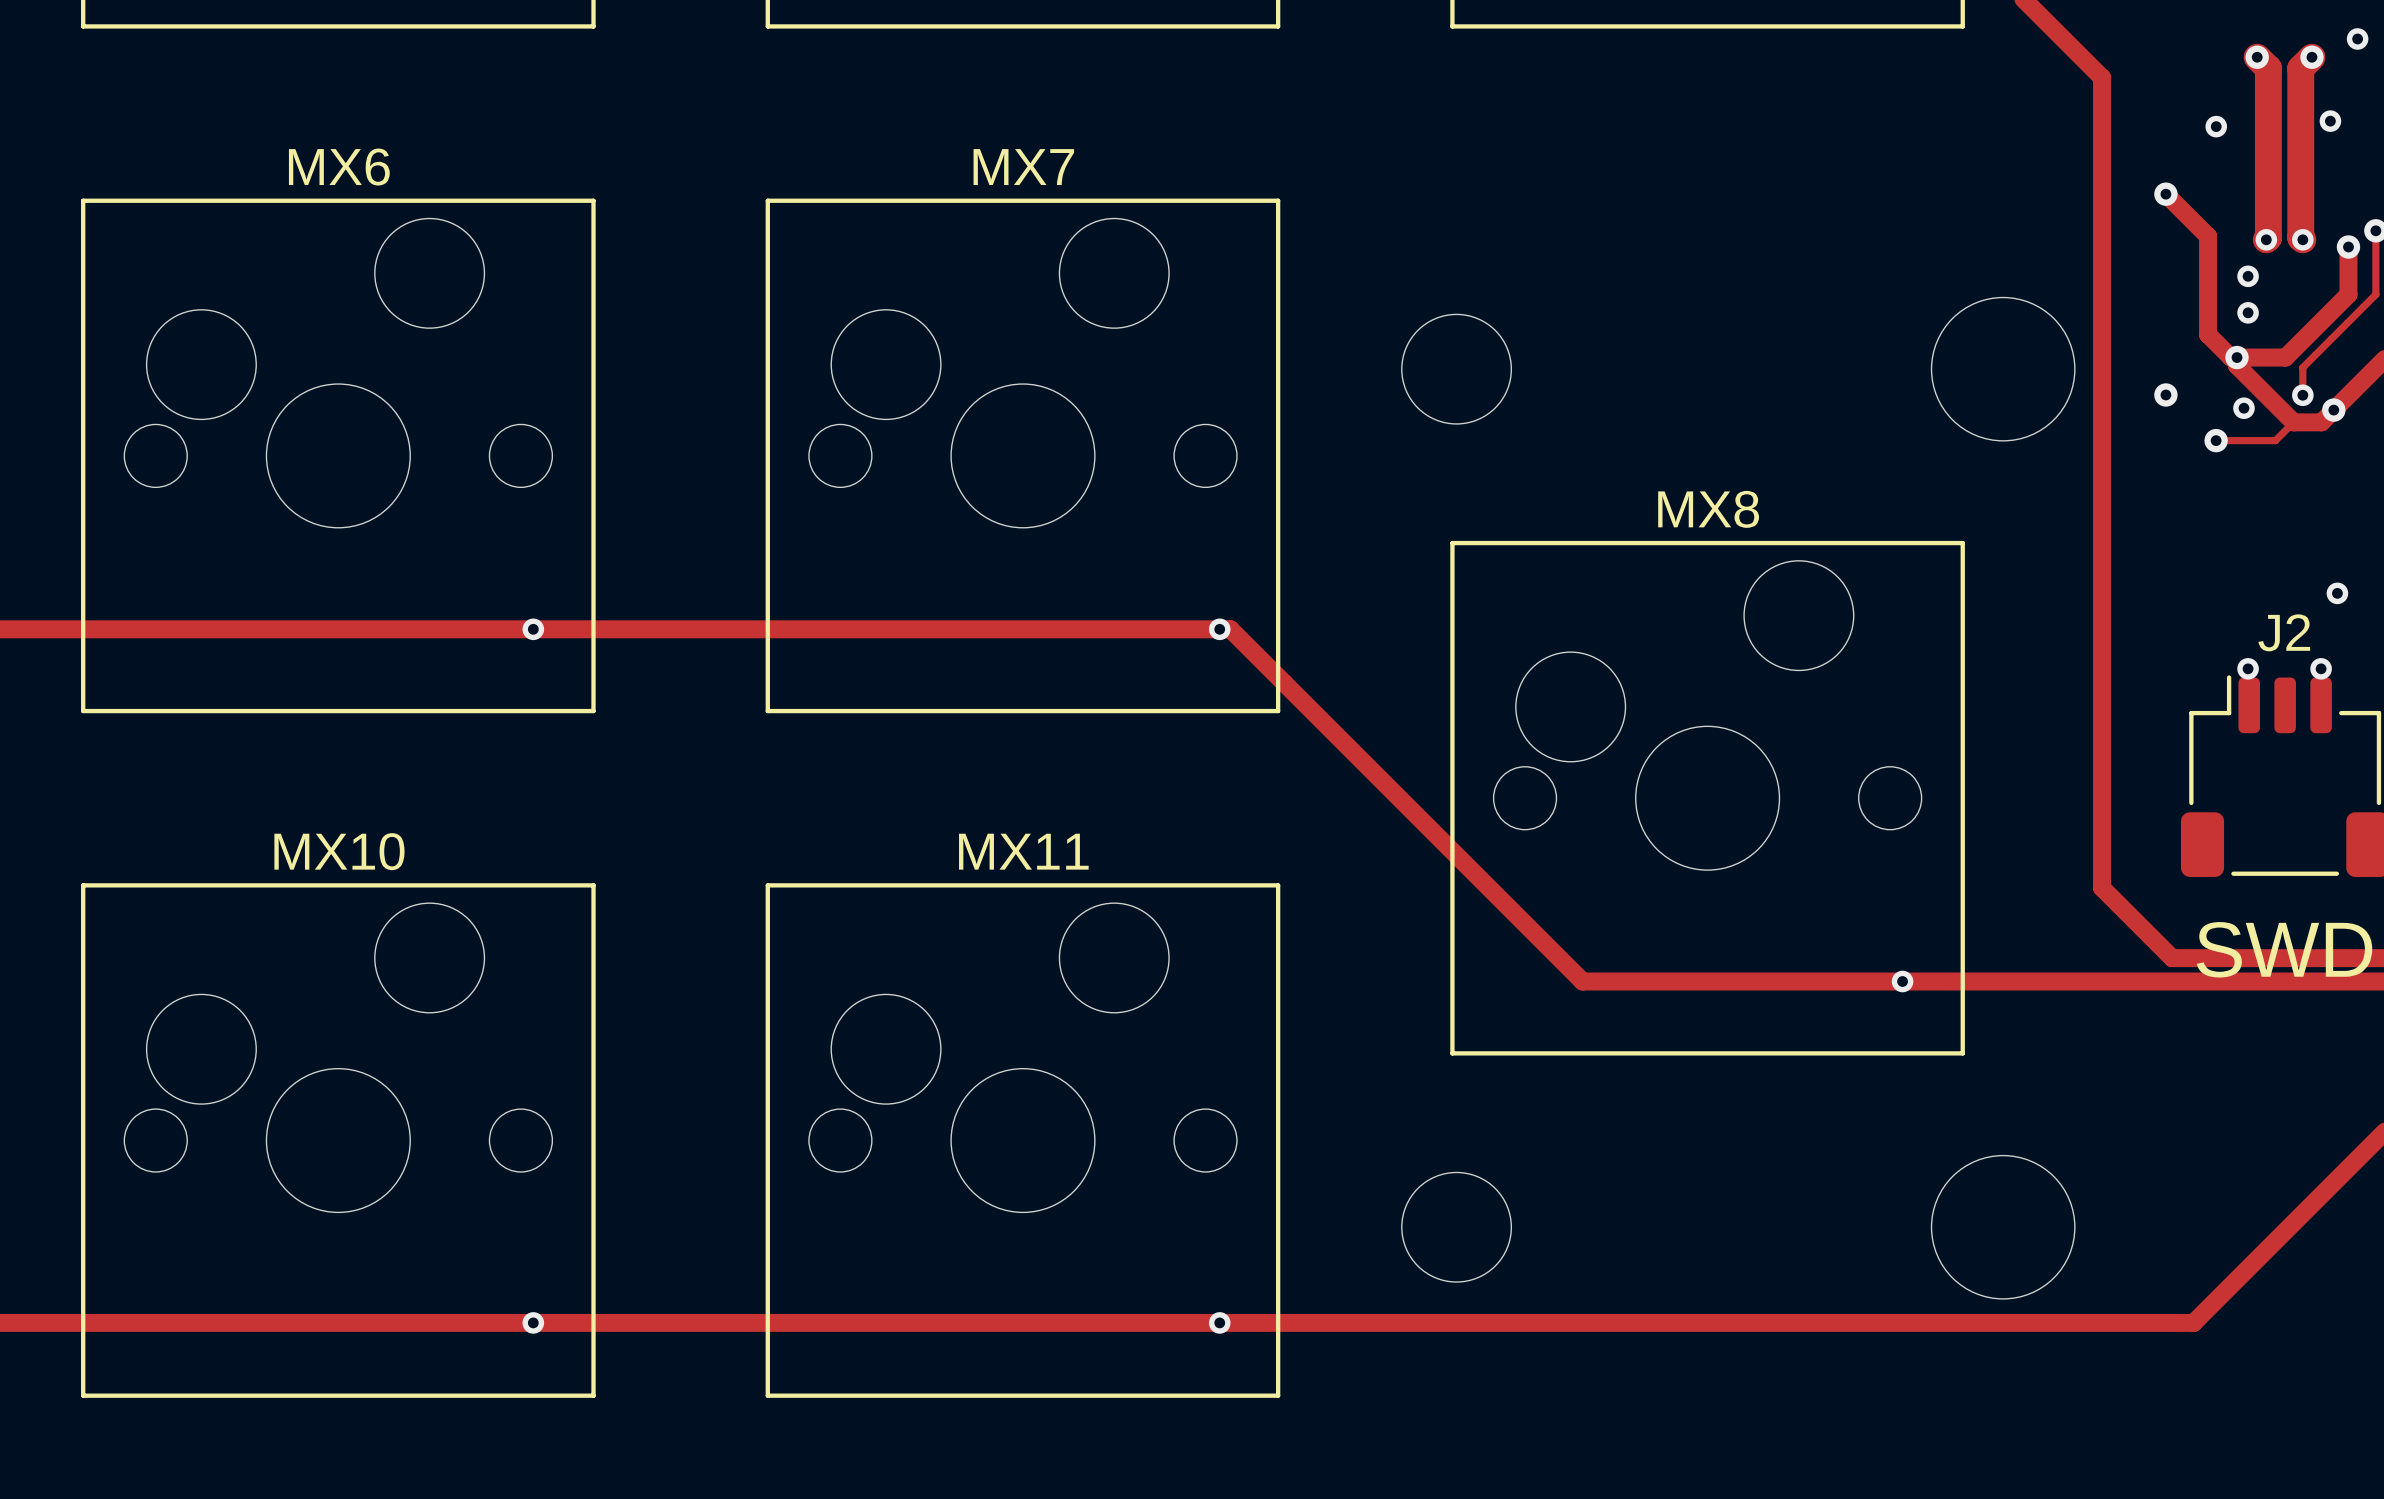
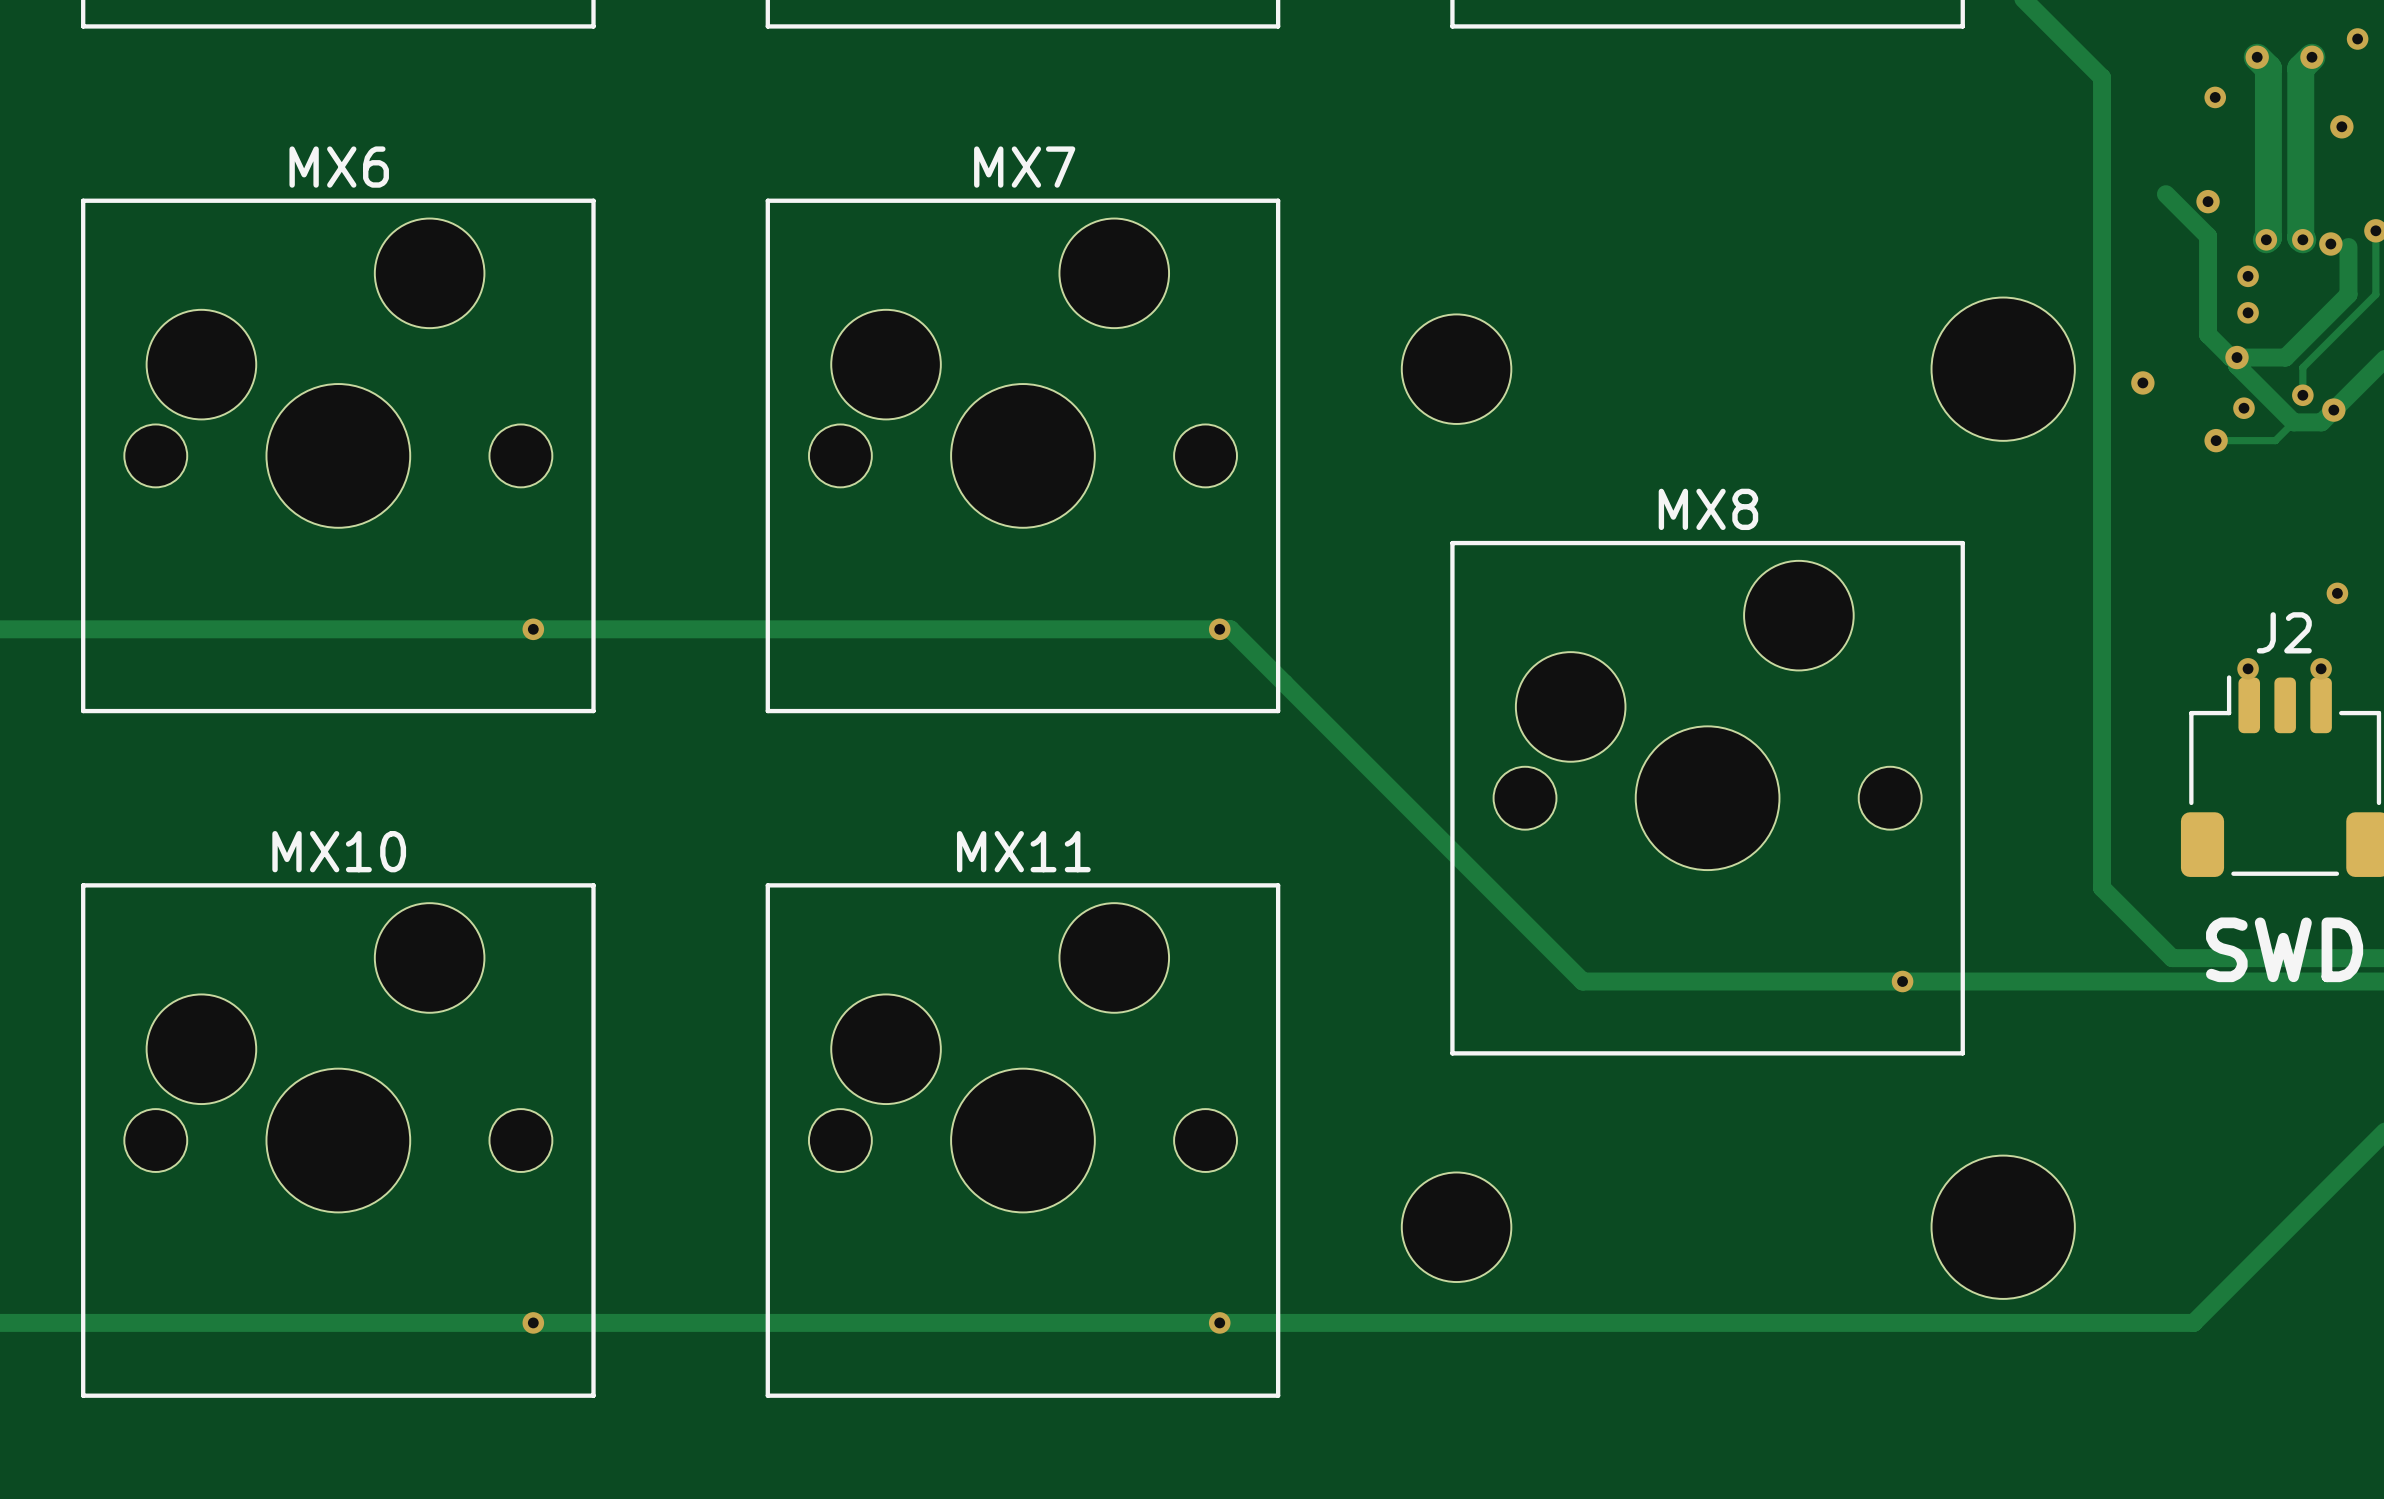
via position: (2330, 121) -> (2341, 126)
via position: (2216, 126) -> (2215, 97)
via position: (2165, 194) -> (2208, 201)
via position: (2348, 247) -> (2330, 244)
via position: (2165, 394) -> (2142, 382)

